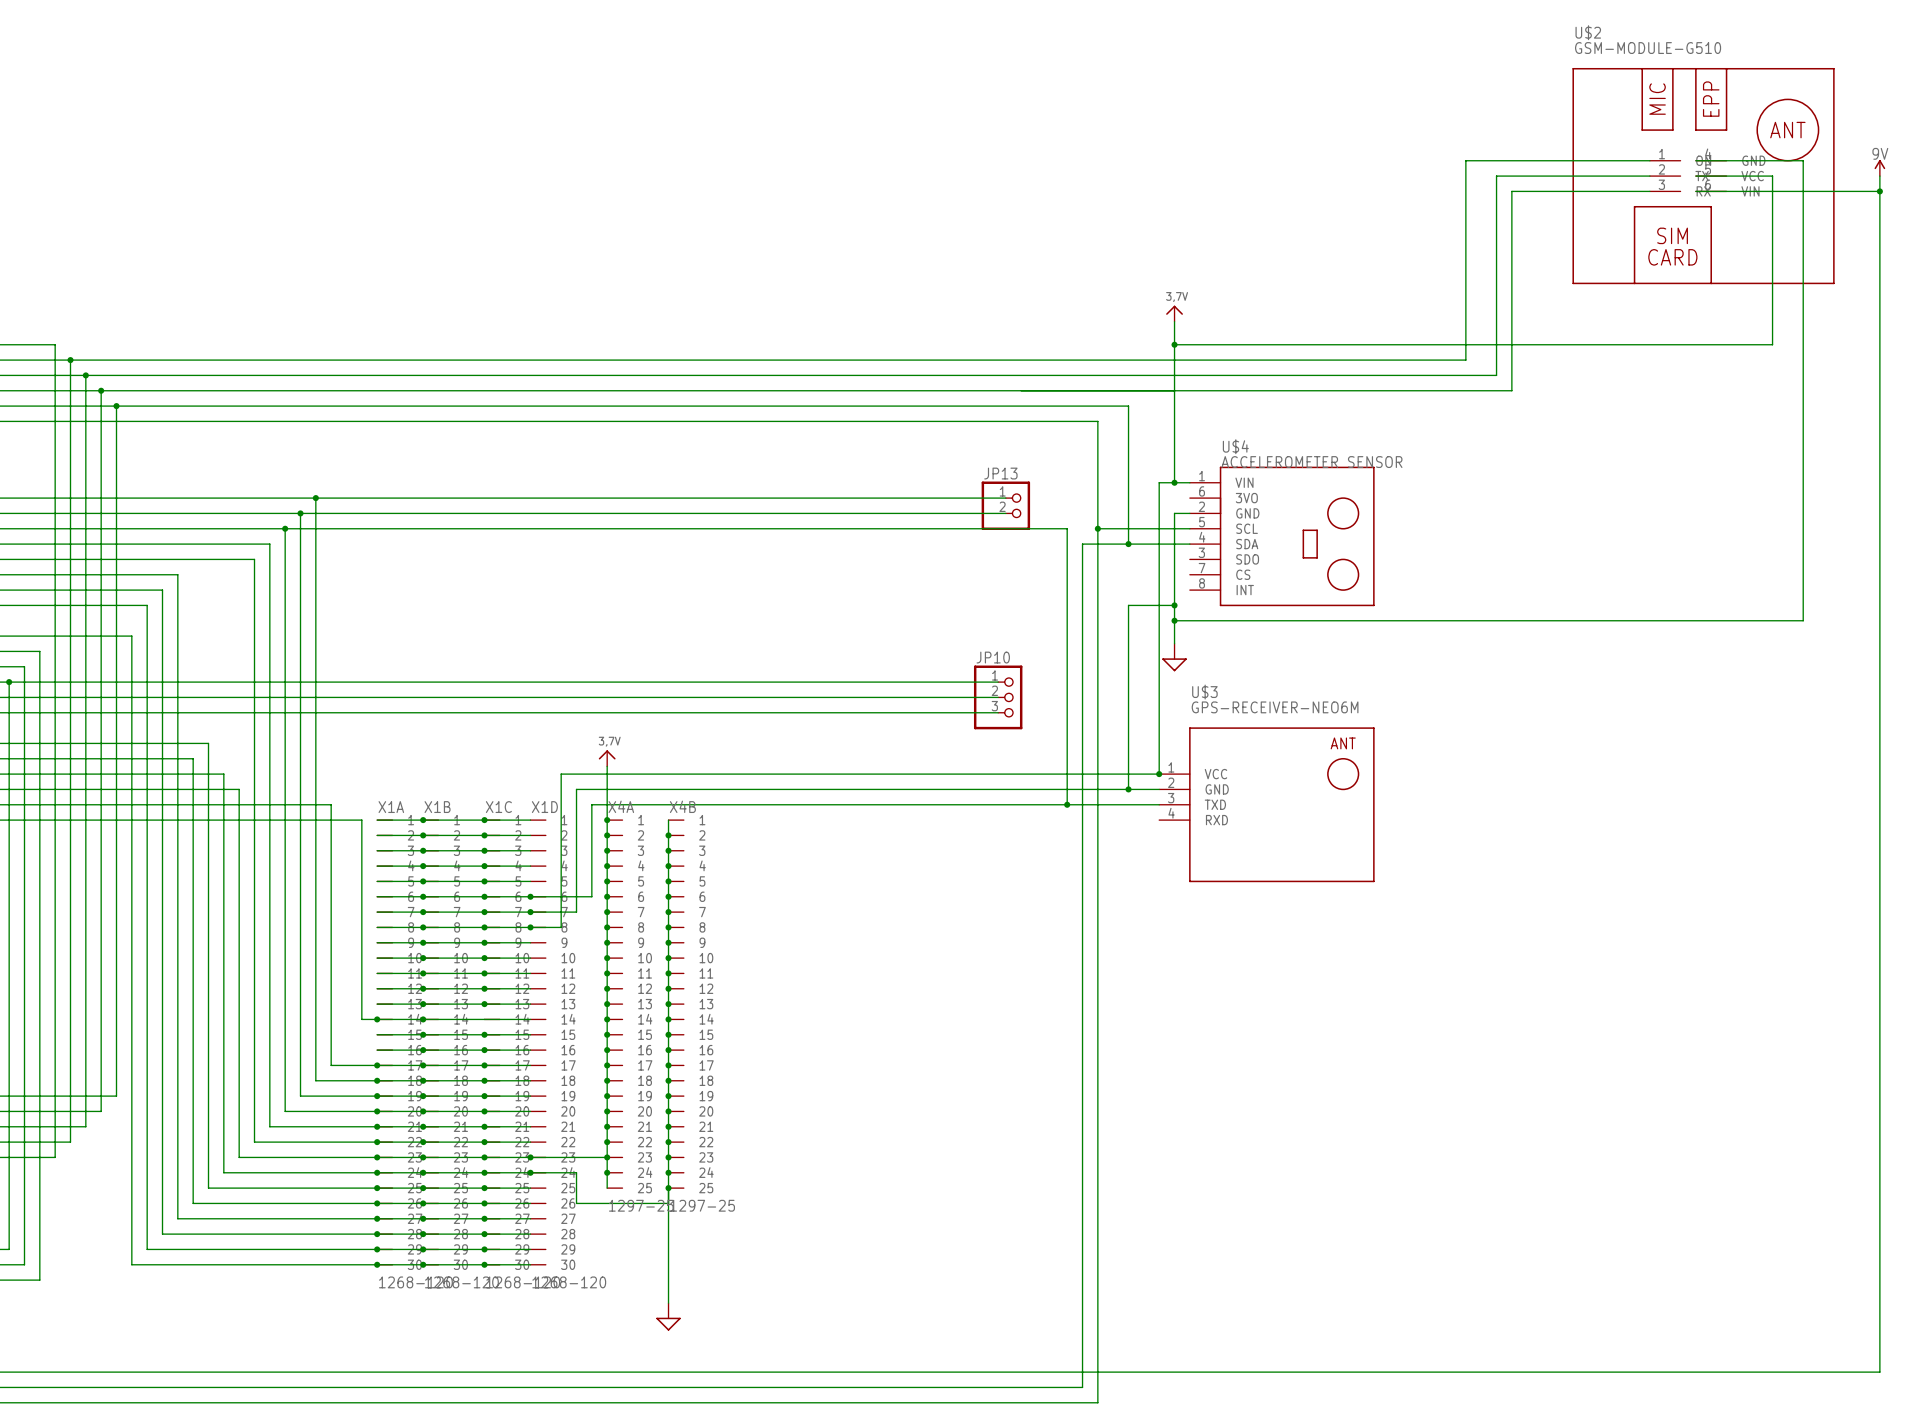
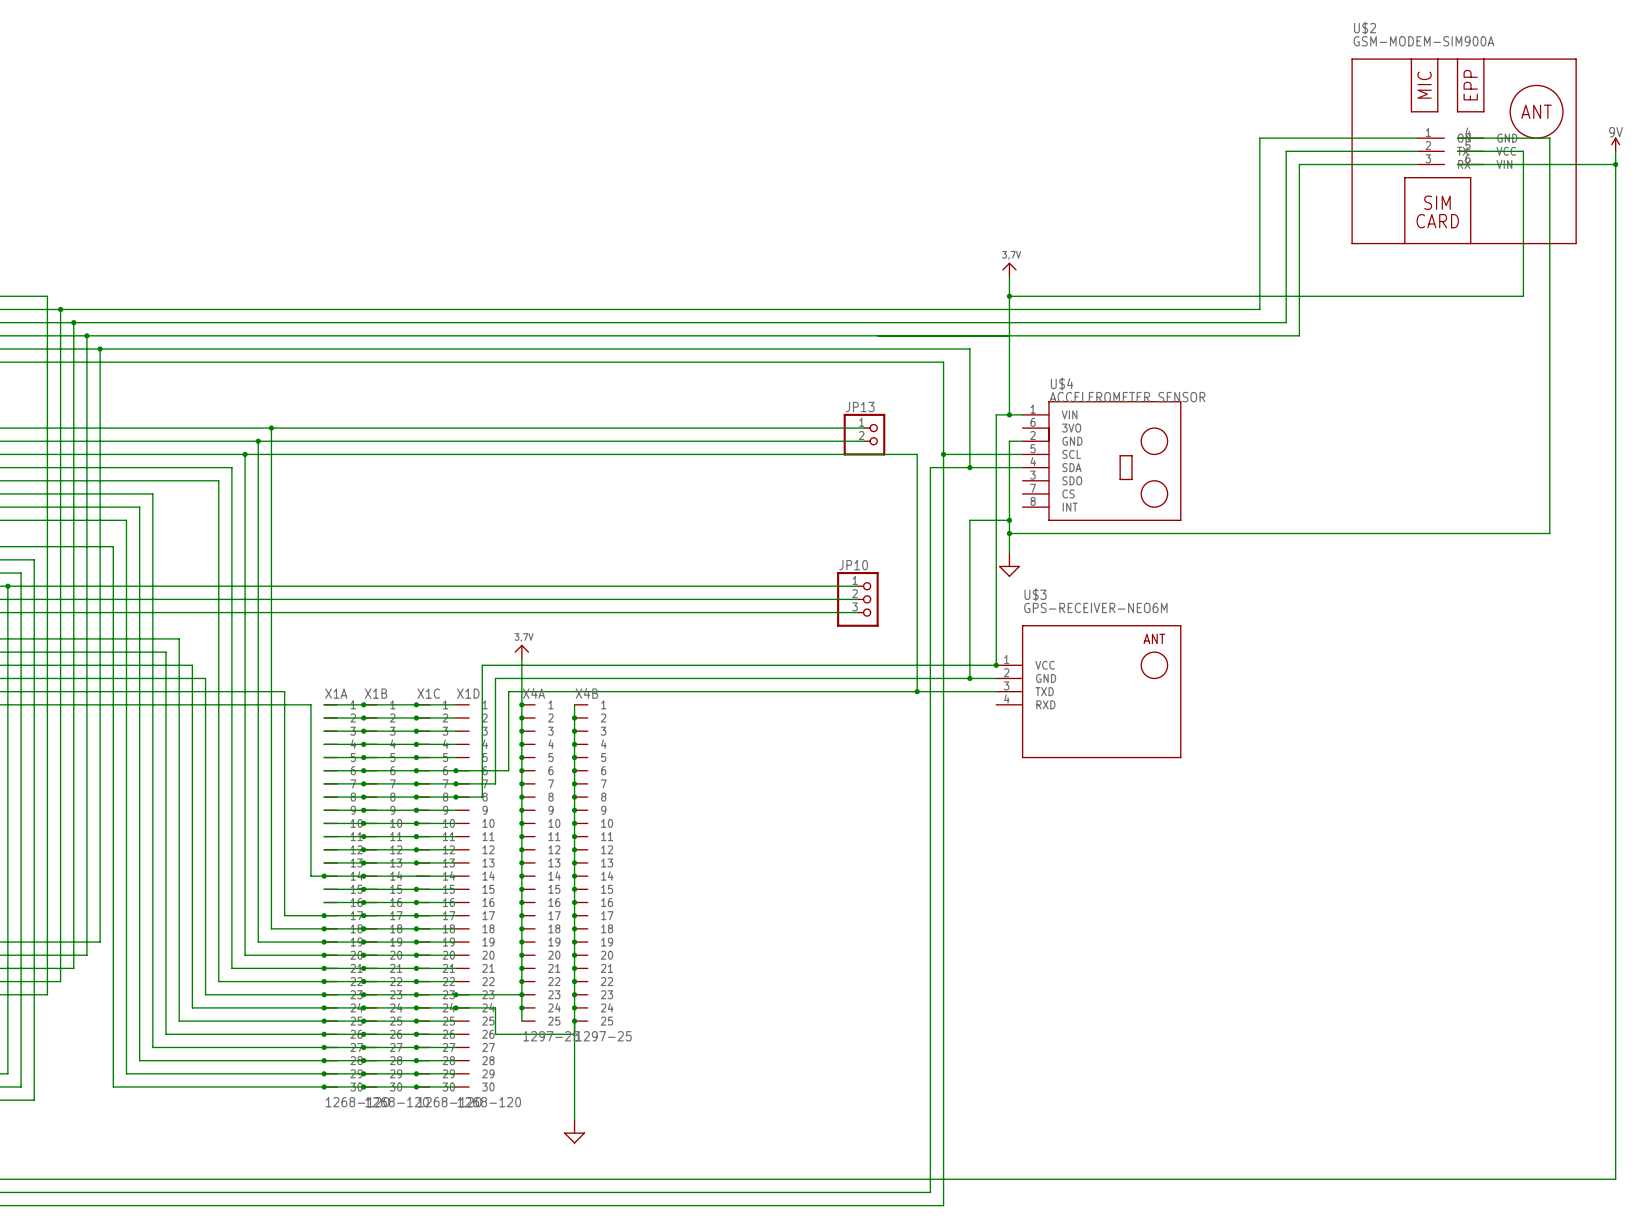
U$2 value: GSM-MODULE-G510 (1648, 48) -> GSM-MODEM-SIM900A (1423, 41)

